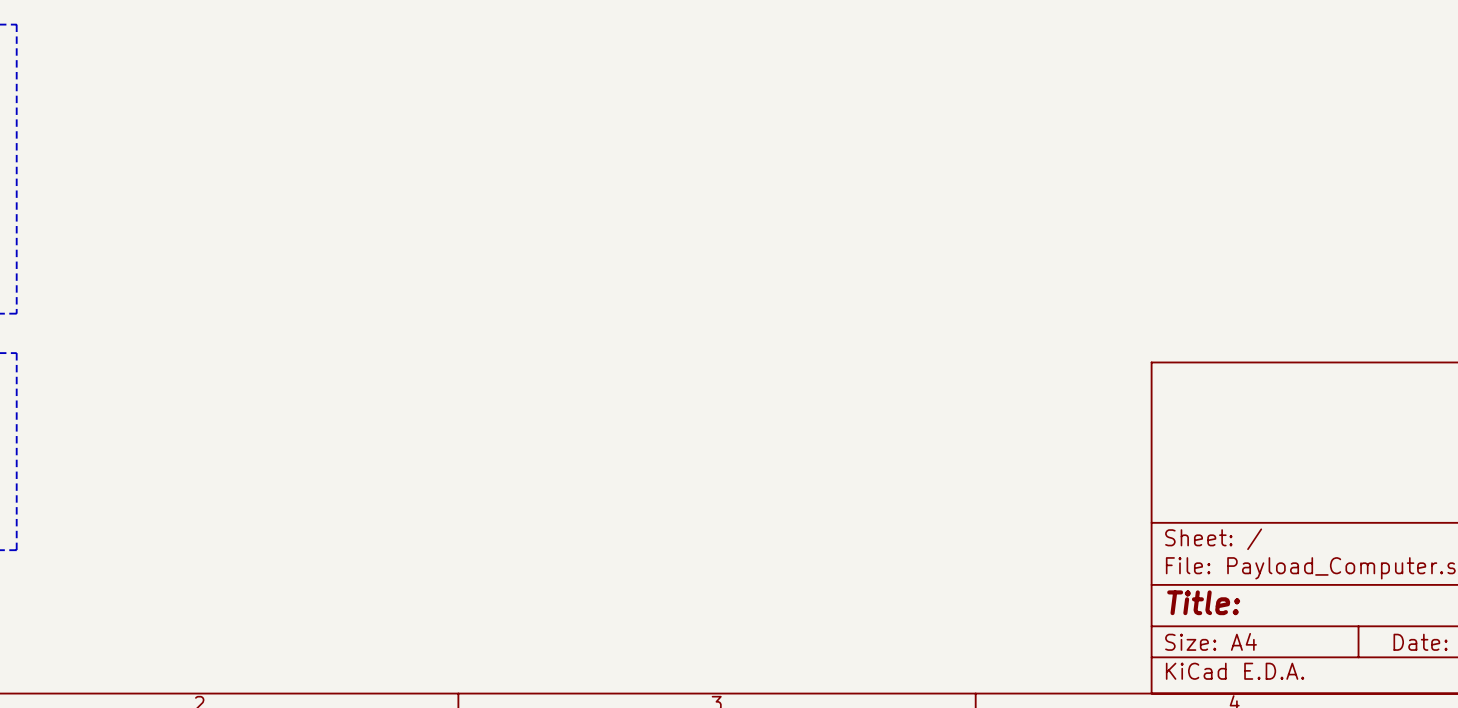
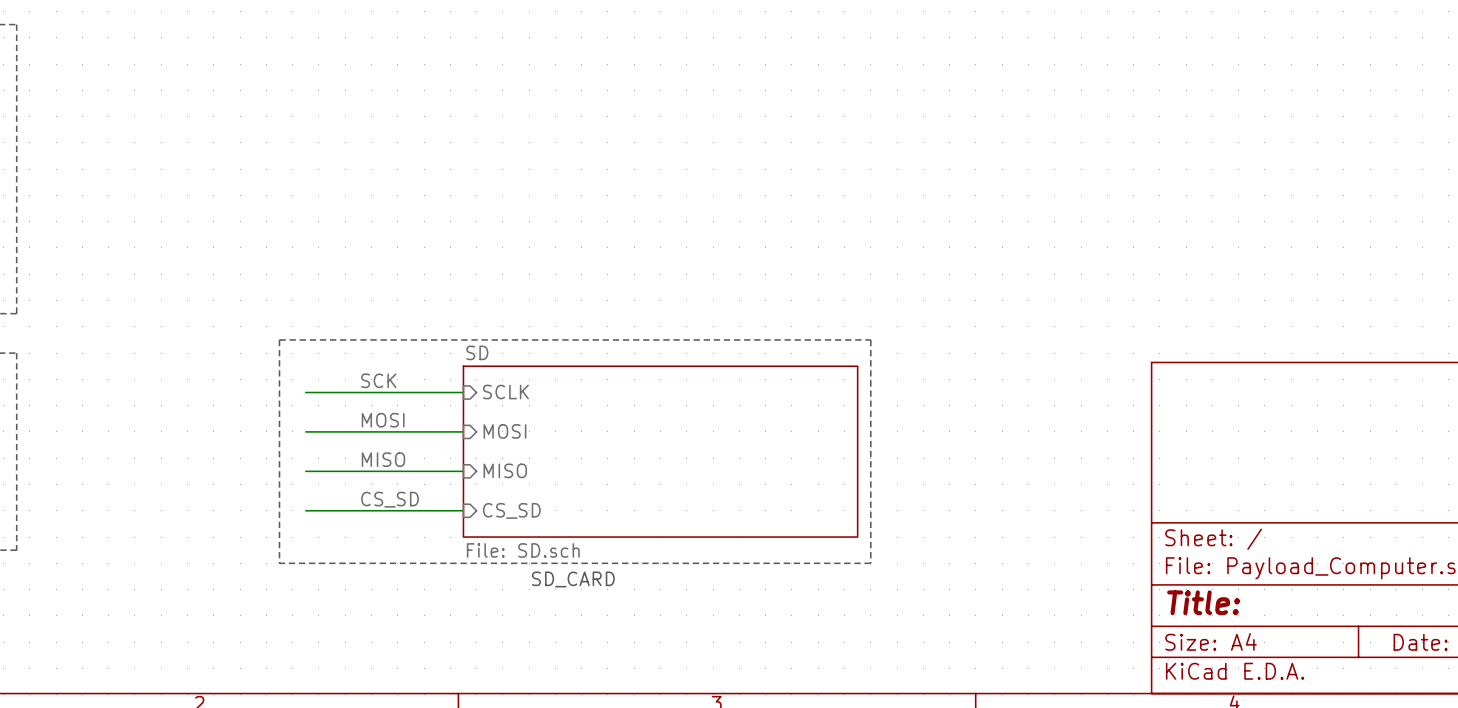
line: none -> (279, 339) (870, 339) (870, 563) (279, 563) (279, 339)
label: none -> SCK (378, 380)
wire: none -> (305, 392) (463, 392)
sheet pin: none -> SCLK (505, 392)
label: none -> MOSI (383, 420)
wire: none -> (305, 431) (463, 431)
sheet pin: none -> MOSI (504, 431)
sheet SD: none -> File: SD.sch (660, 451)
label: none -> MISO (383, 459)
sheet pin: none -> MISO (505, 470)
wire: none -> (305, 471) (463, 471)
label: none -> CS_SD (390, 499)
wire: none -> (305, 510) (463, 510)
sheet pin: none -> CS_SD (511, 510)
text: none -> SD_CARD (573, 579)

